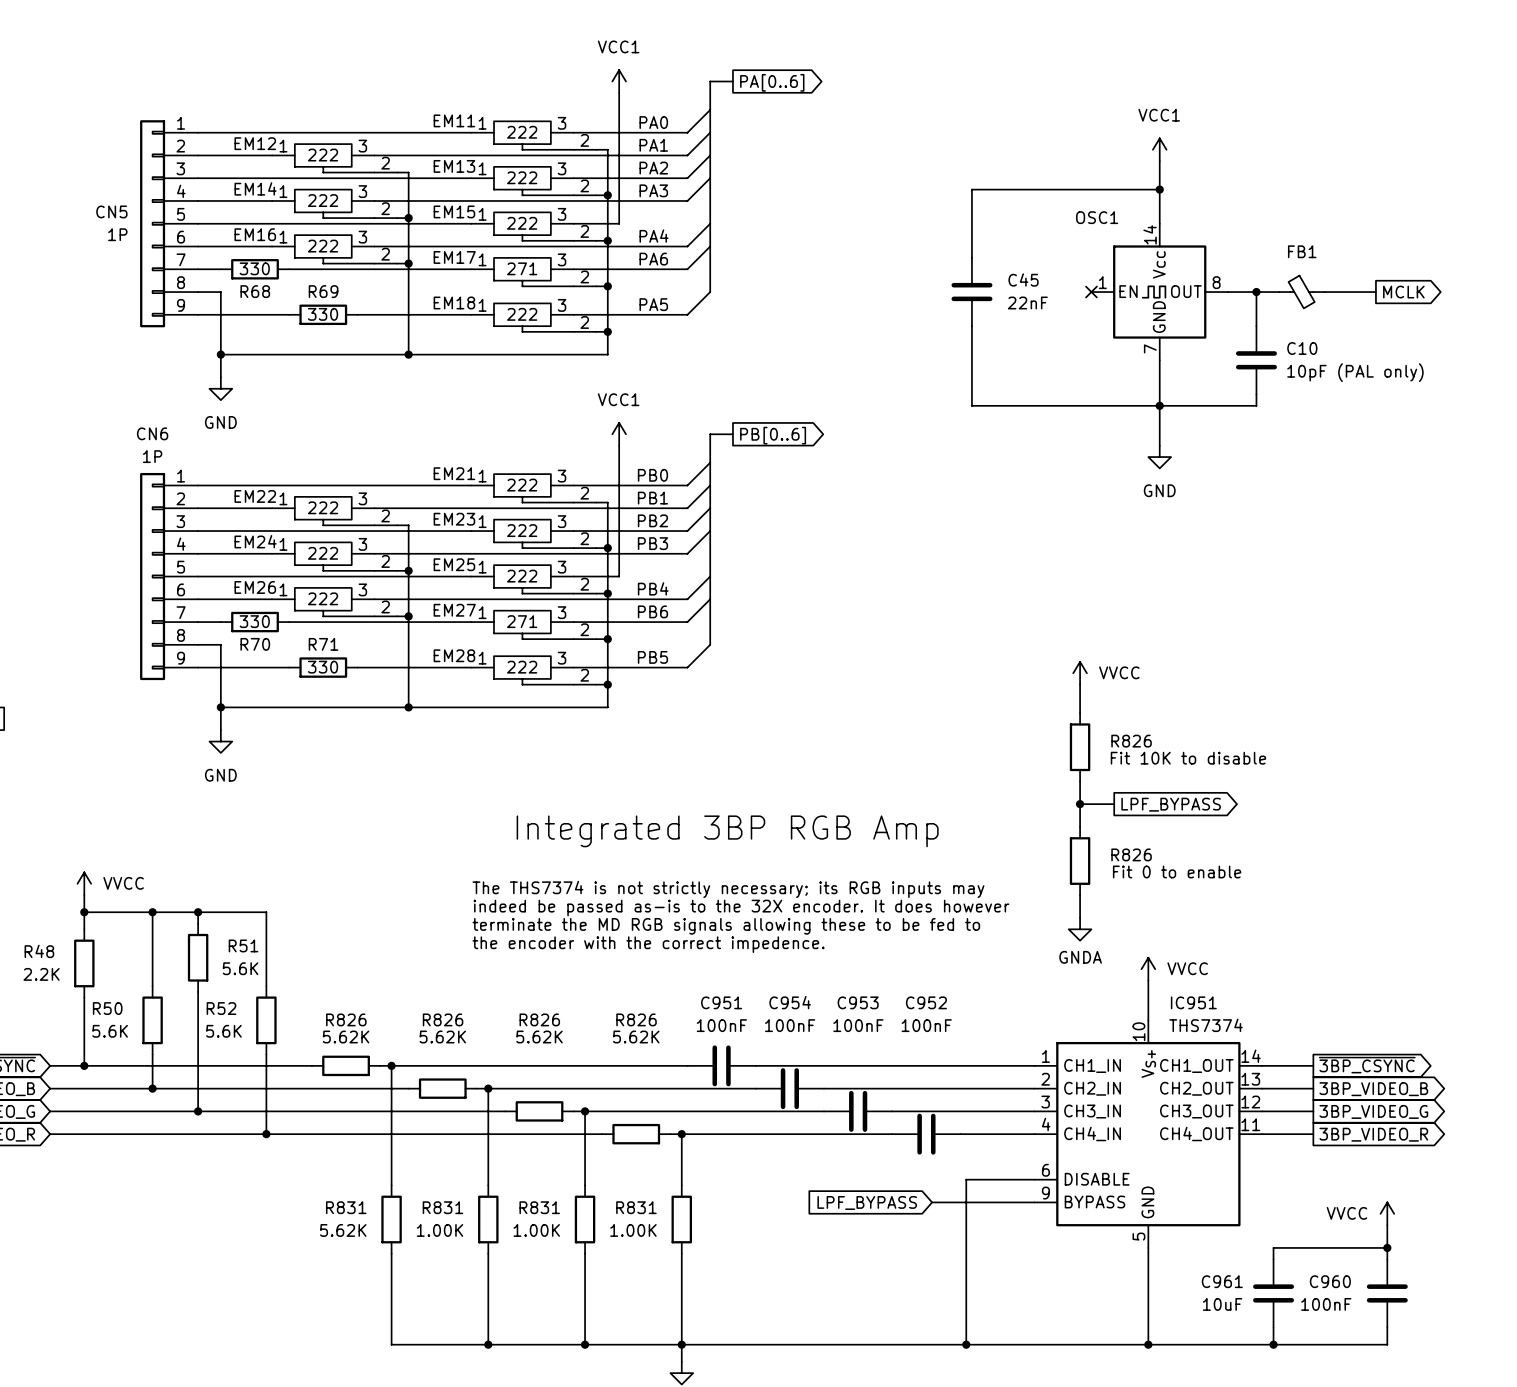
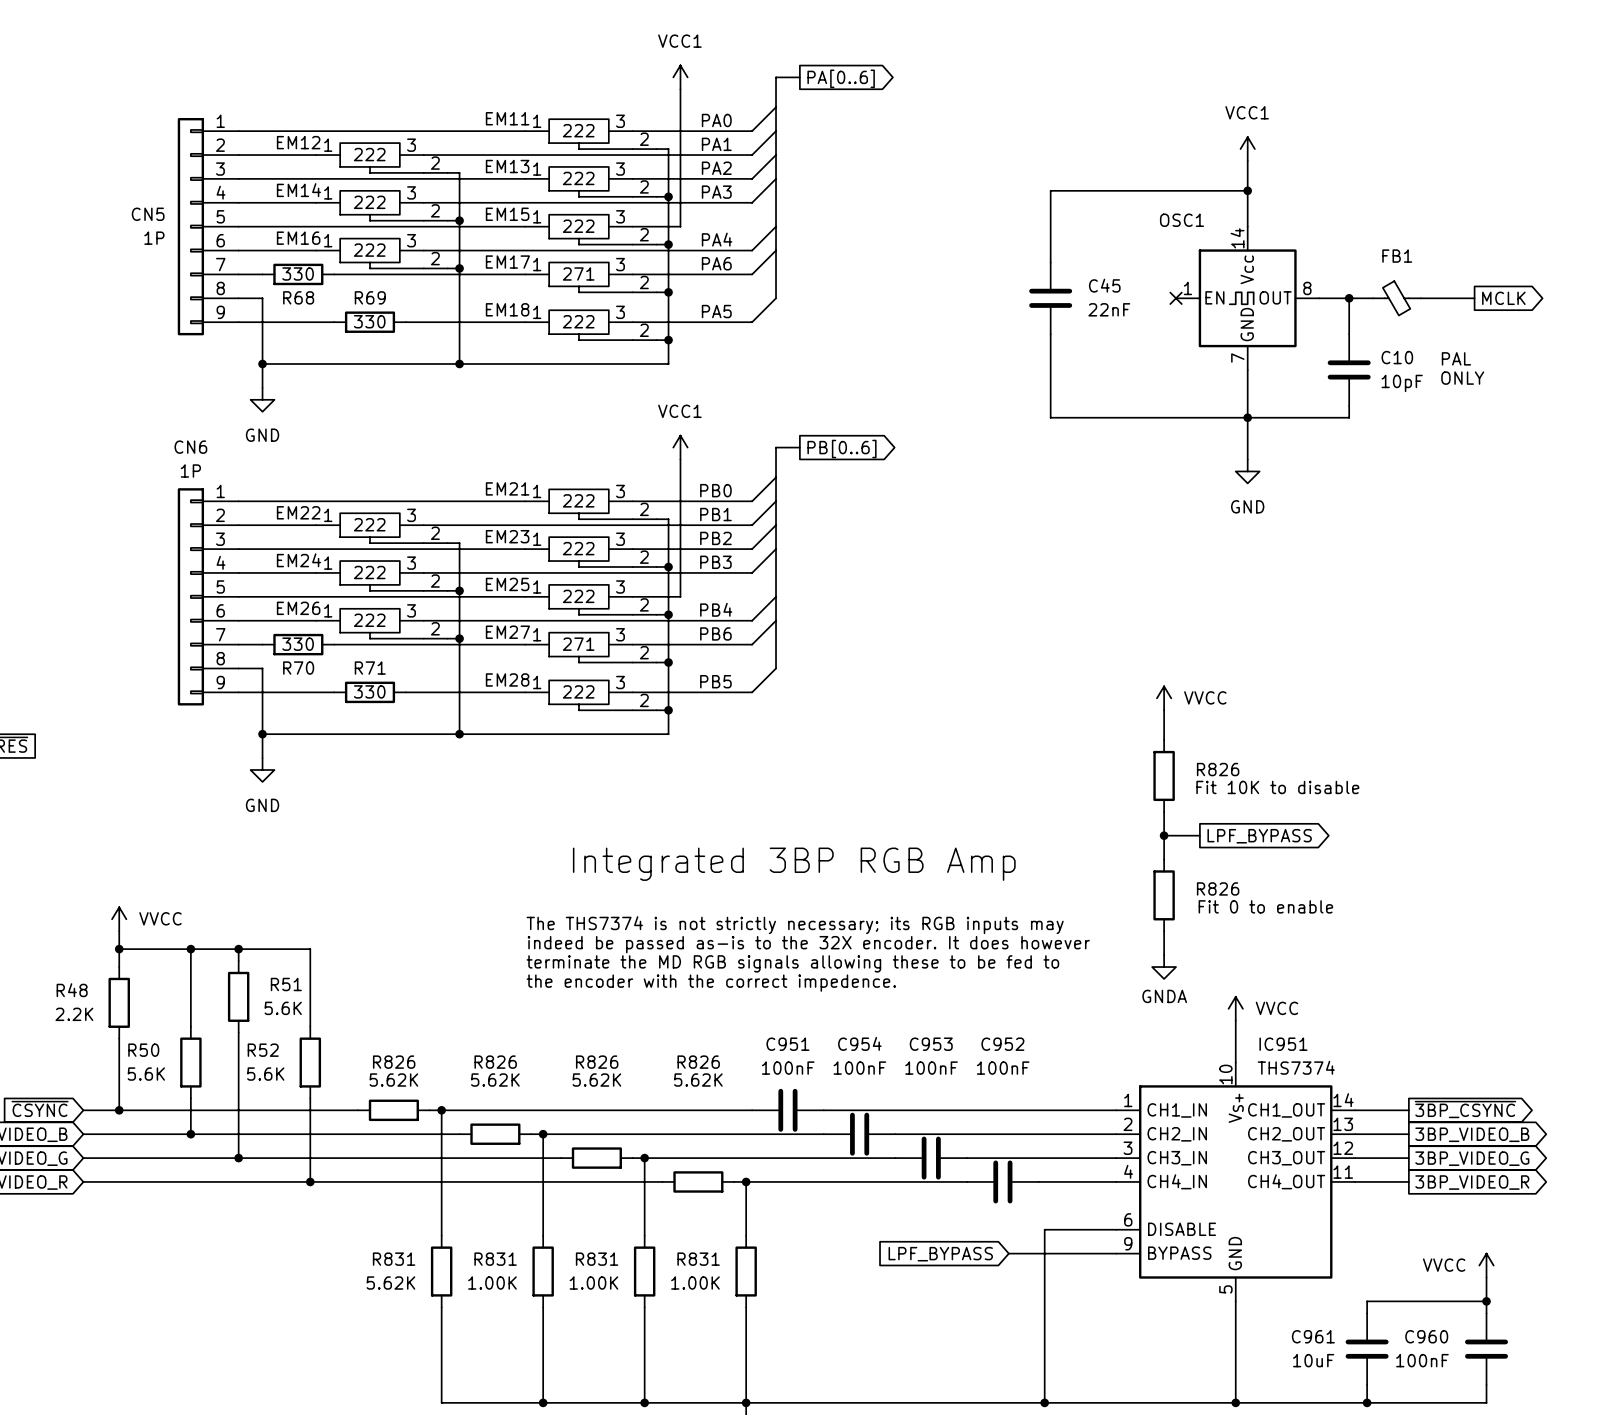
text: none -> PAL (1456, 358)
text: none -> ONLY (1462, 378)
C10 value: 10pF (PAL only) (1355, 372) -> 10pF (1402, 383)

